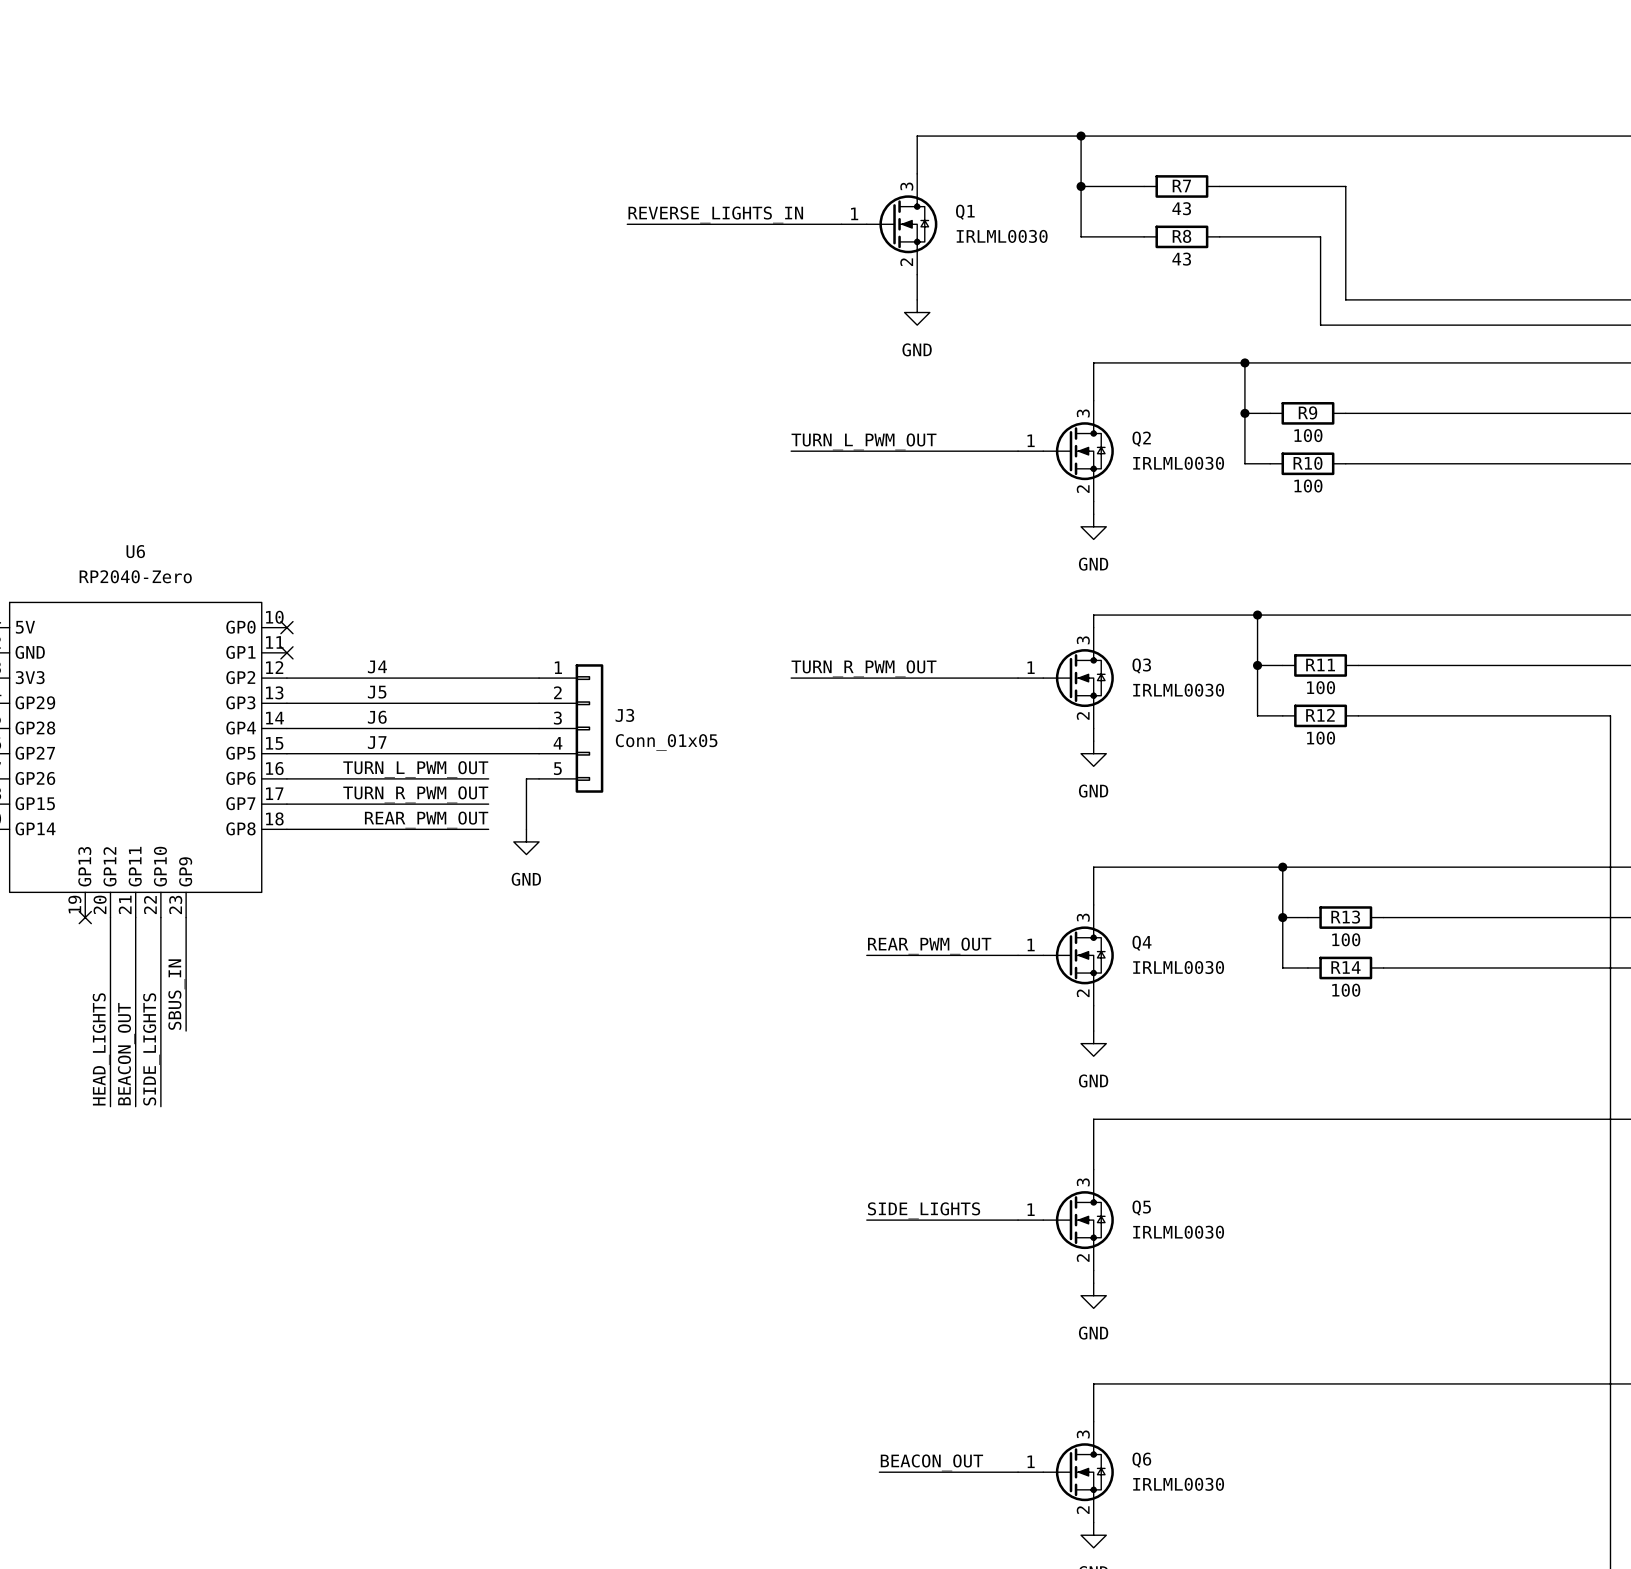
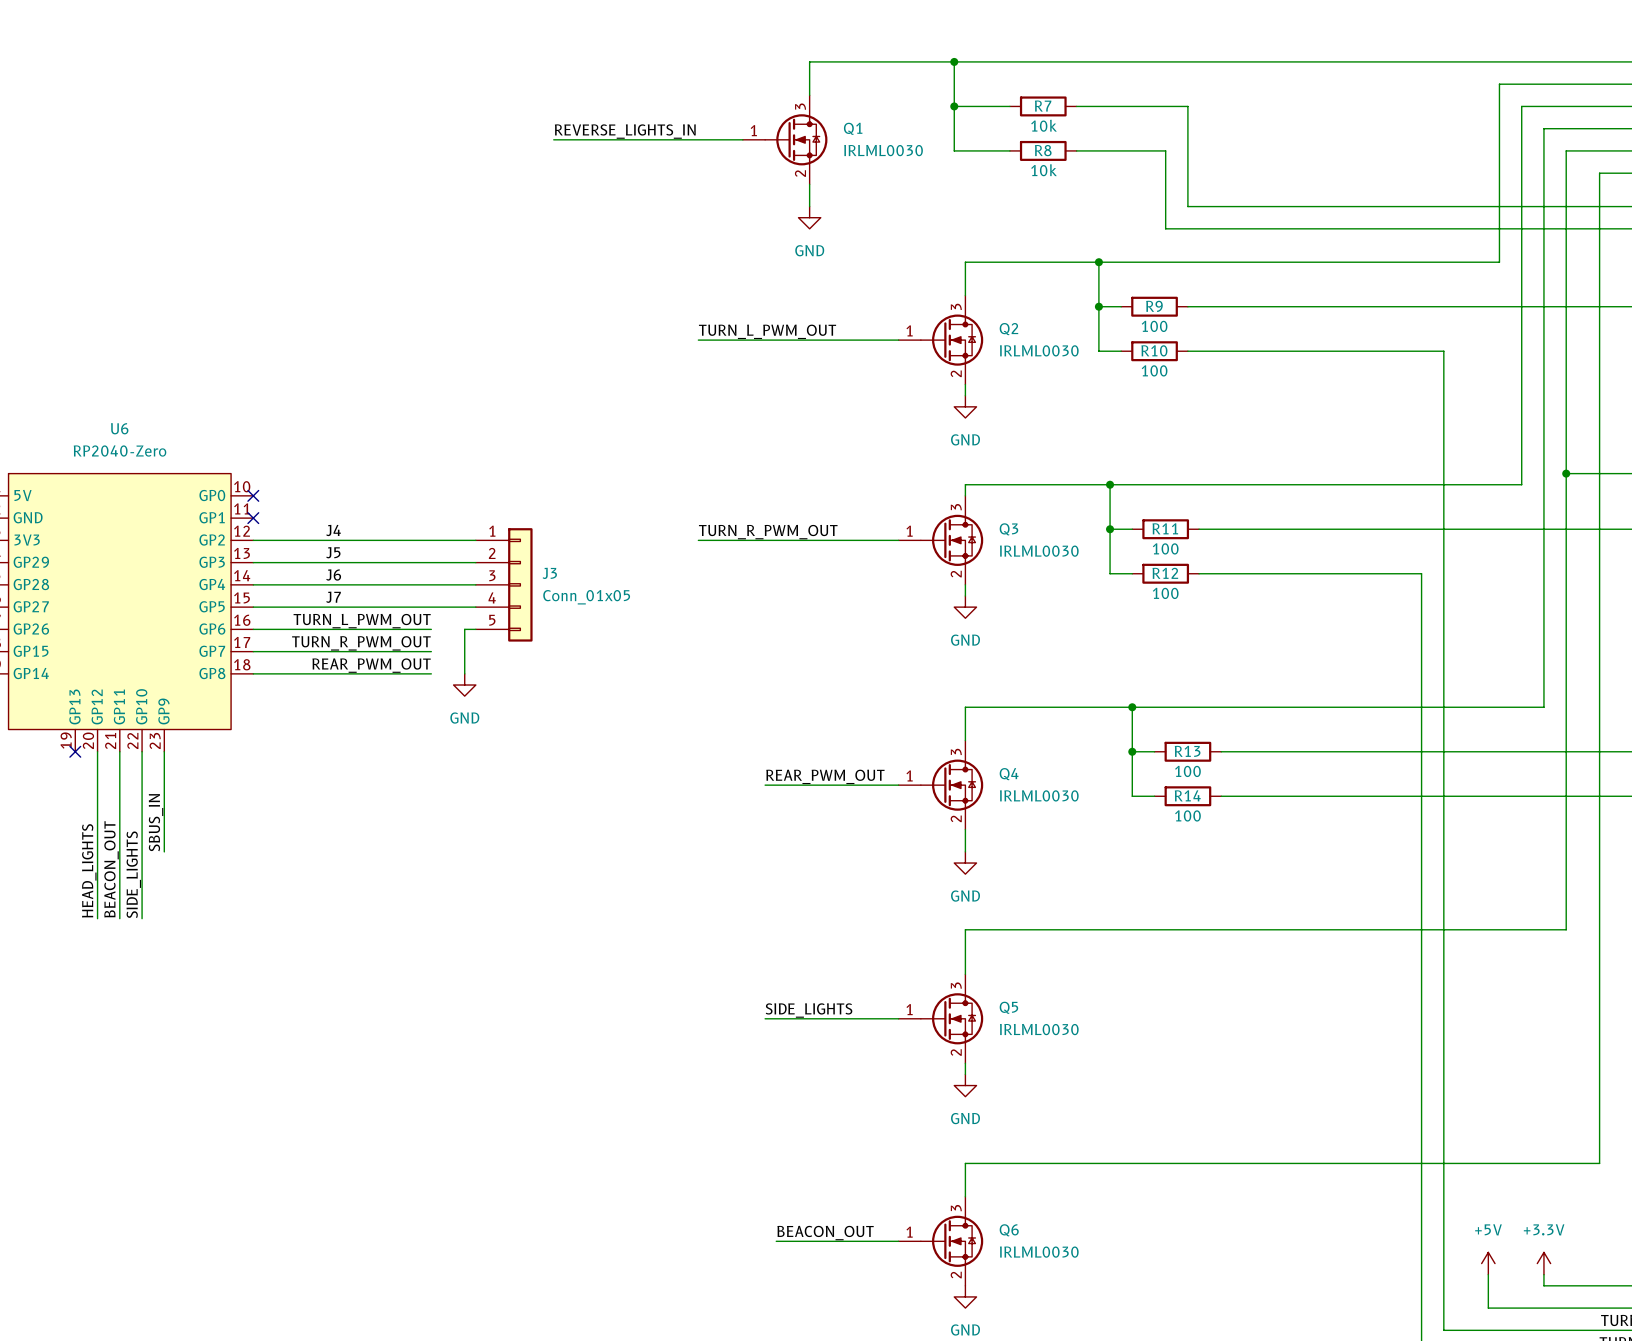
R7 value: 43 (1181, 208) -> 10k (1044, 125)
R8 value: 43 (1181, 259) -> 10k (1044, 170)

